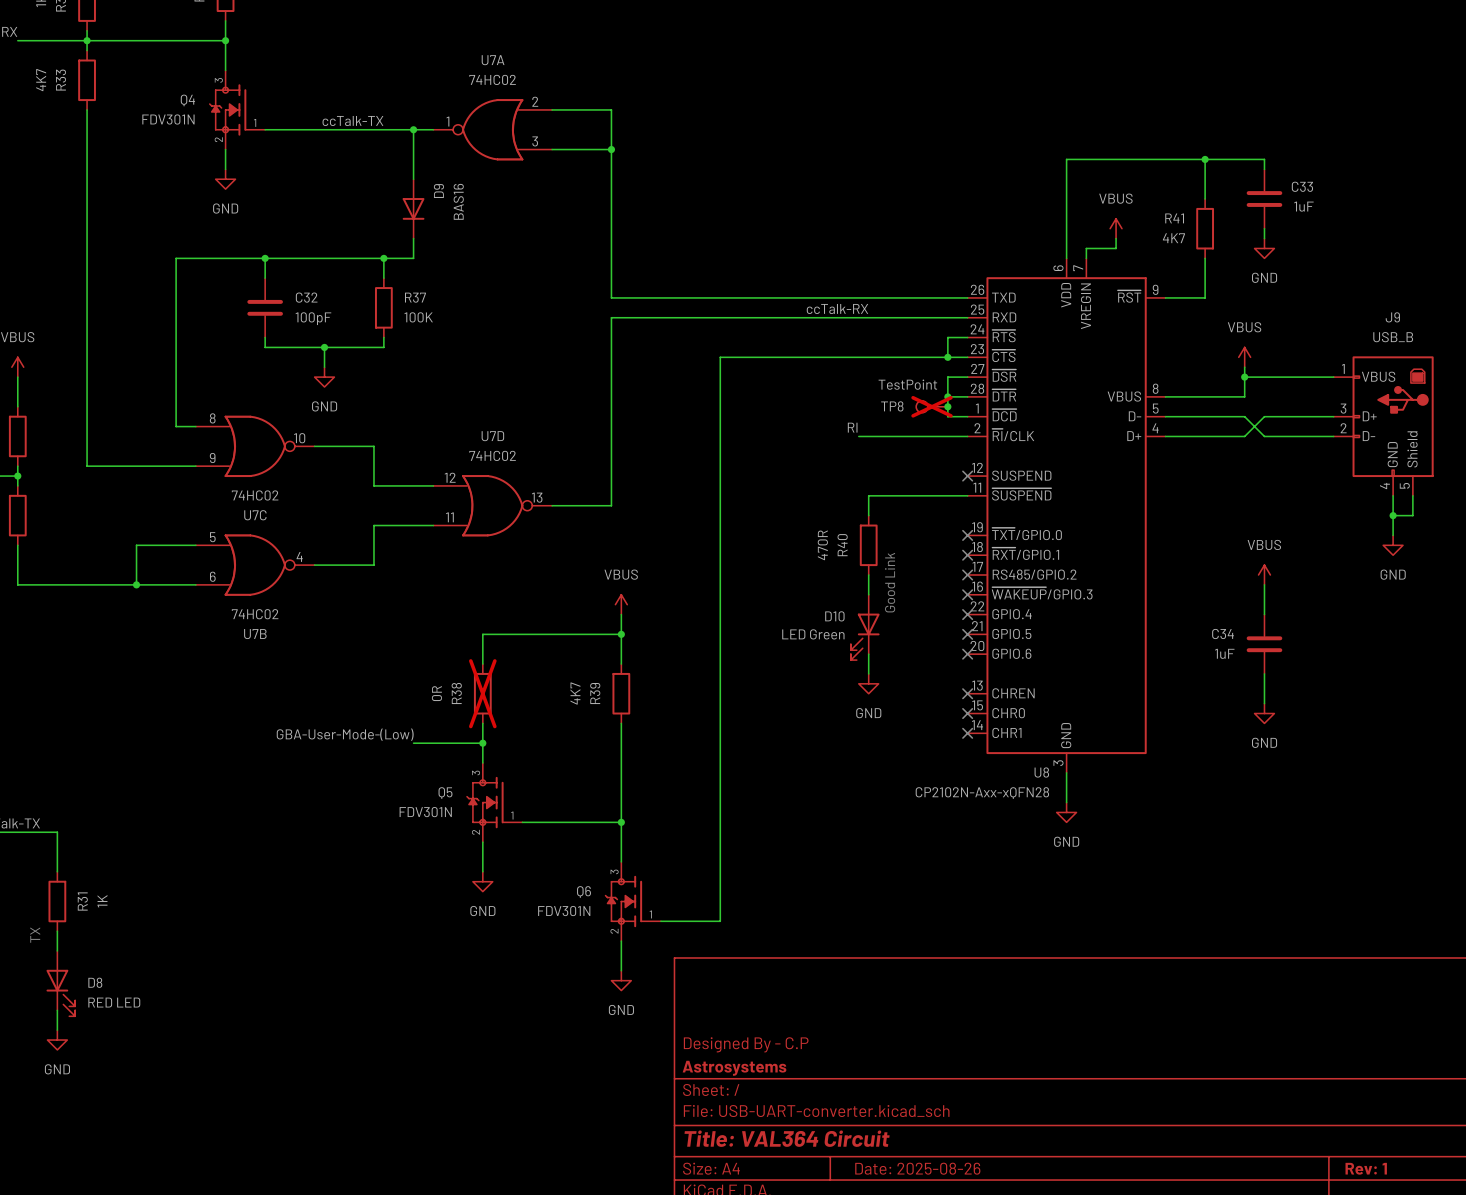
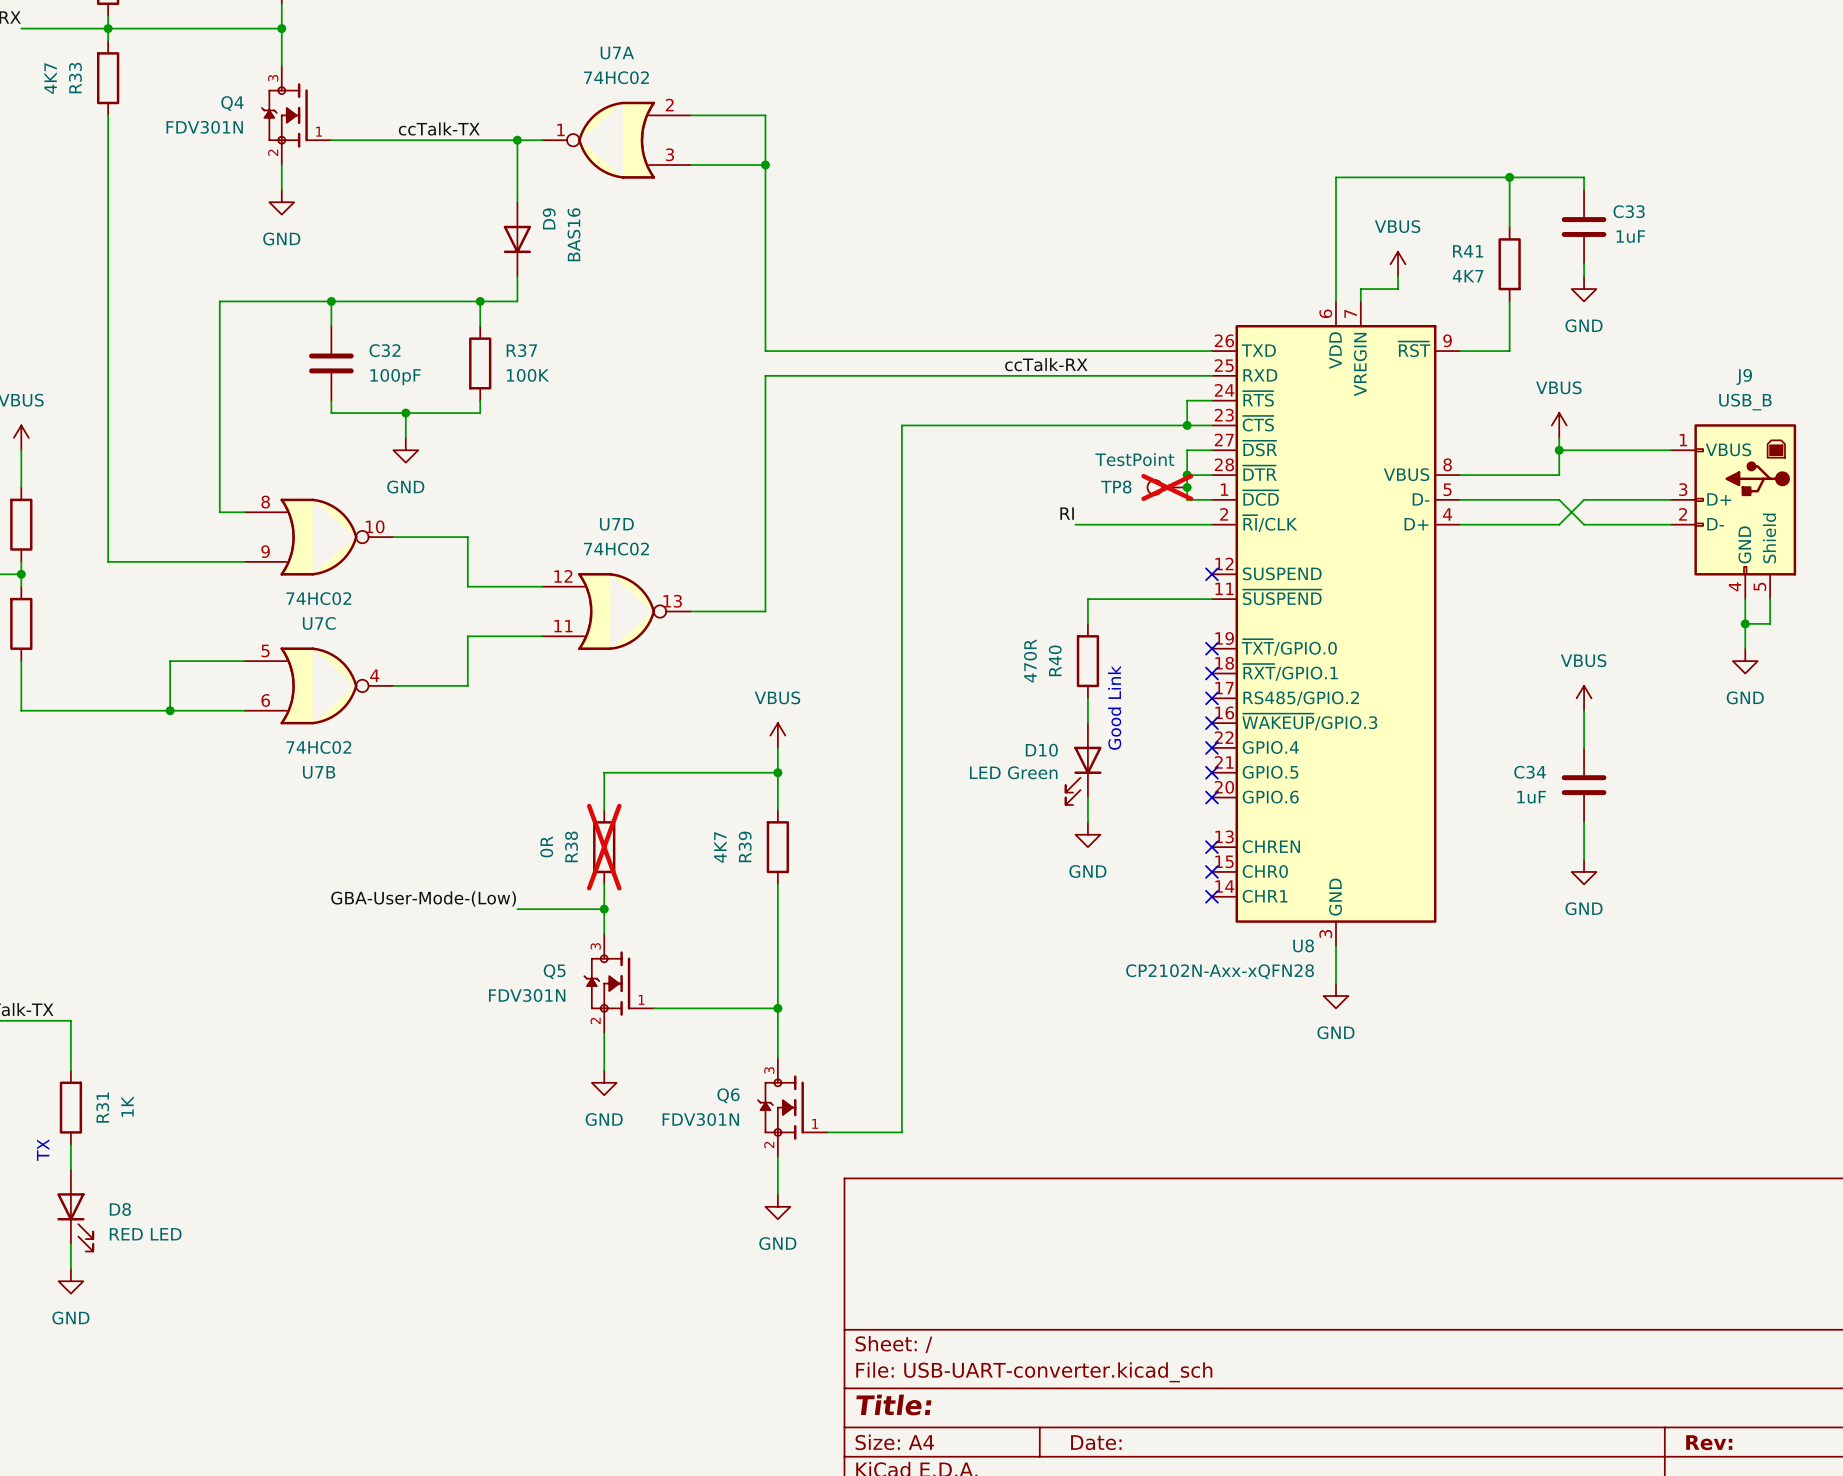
title block: Designed By - C.P (746, 1044) -> none
title block: Astrosystems (734, 1068) -> none
title block: Title: VAL364 Circuit (787, 1138) -> Title: (893, 1405)
title block: Date: 2025-08-26 (917, 1168) -> Date: (1096, 1442)
title block: Rev: 1 (1366, 1168) -> Rev: (1709, 1442)

